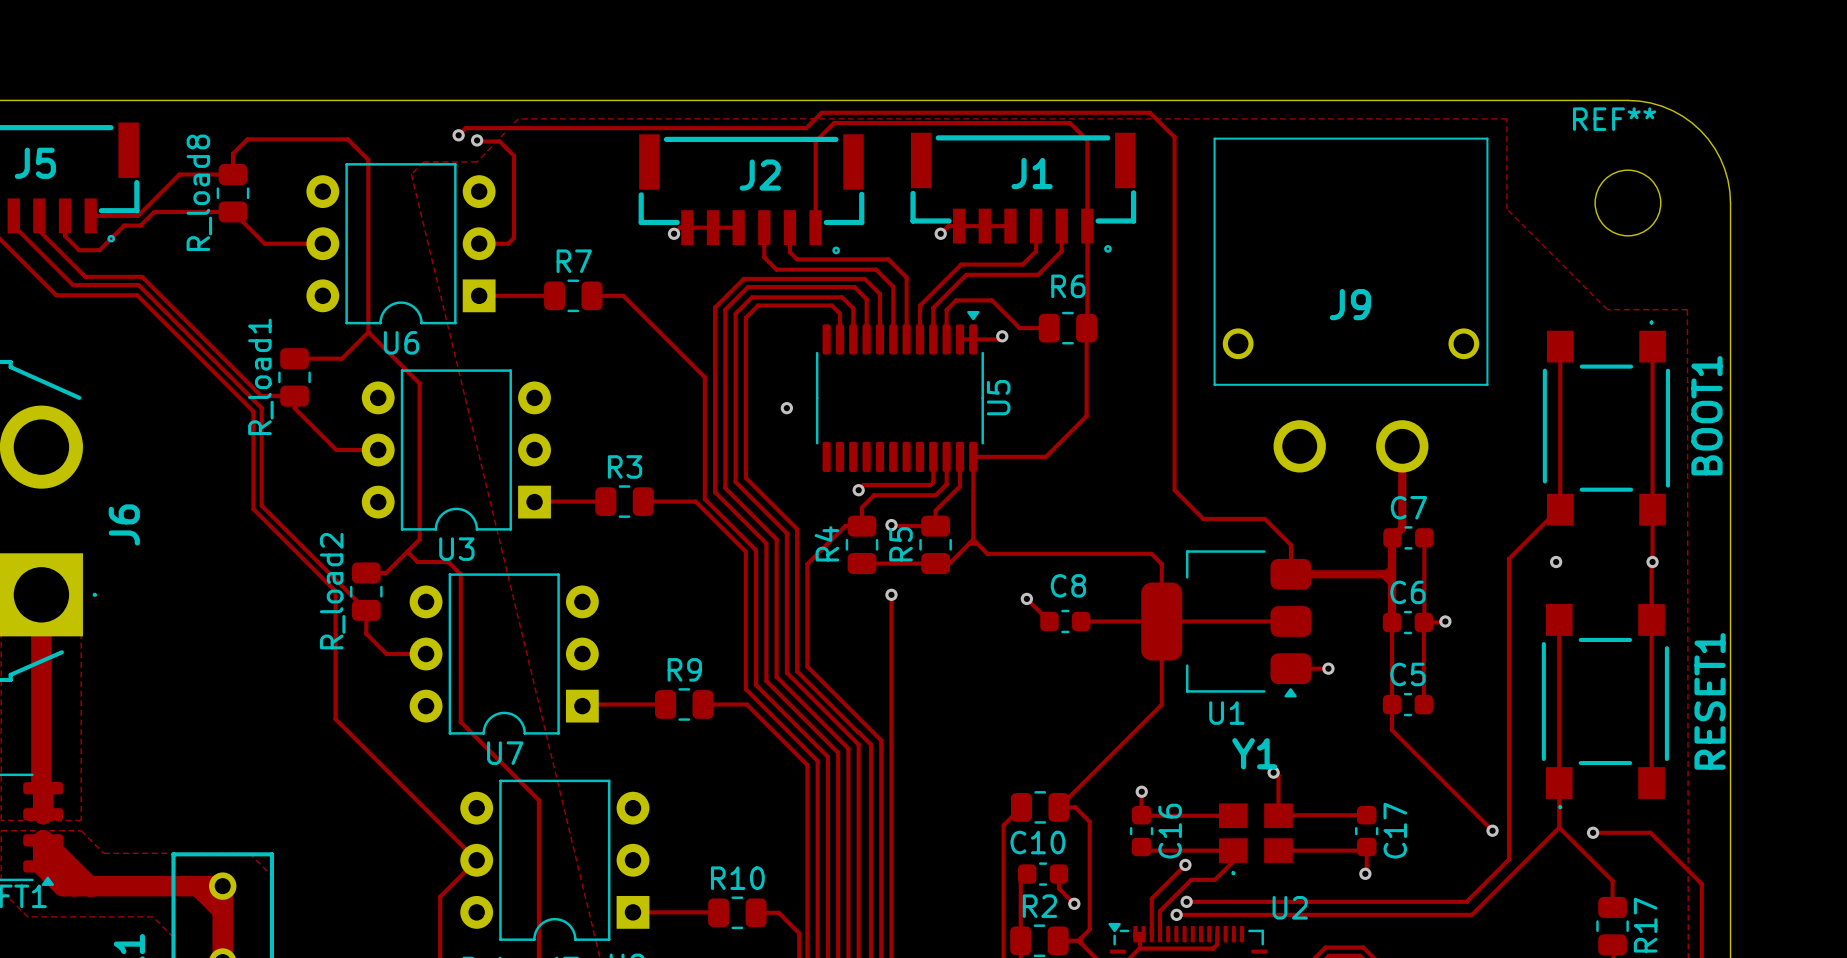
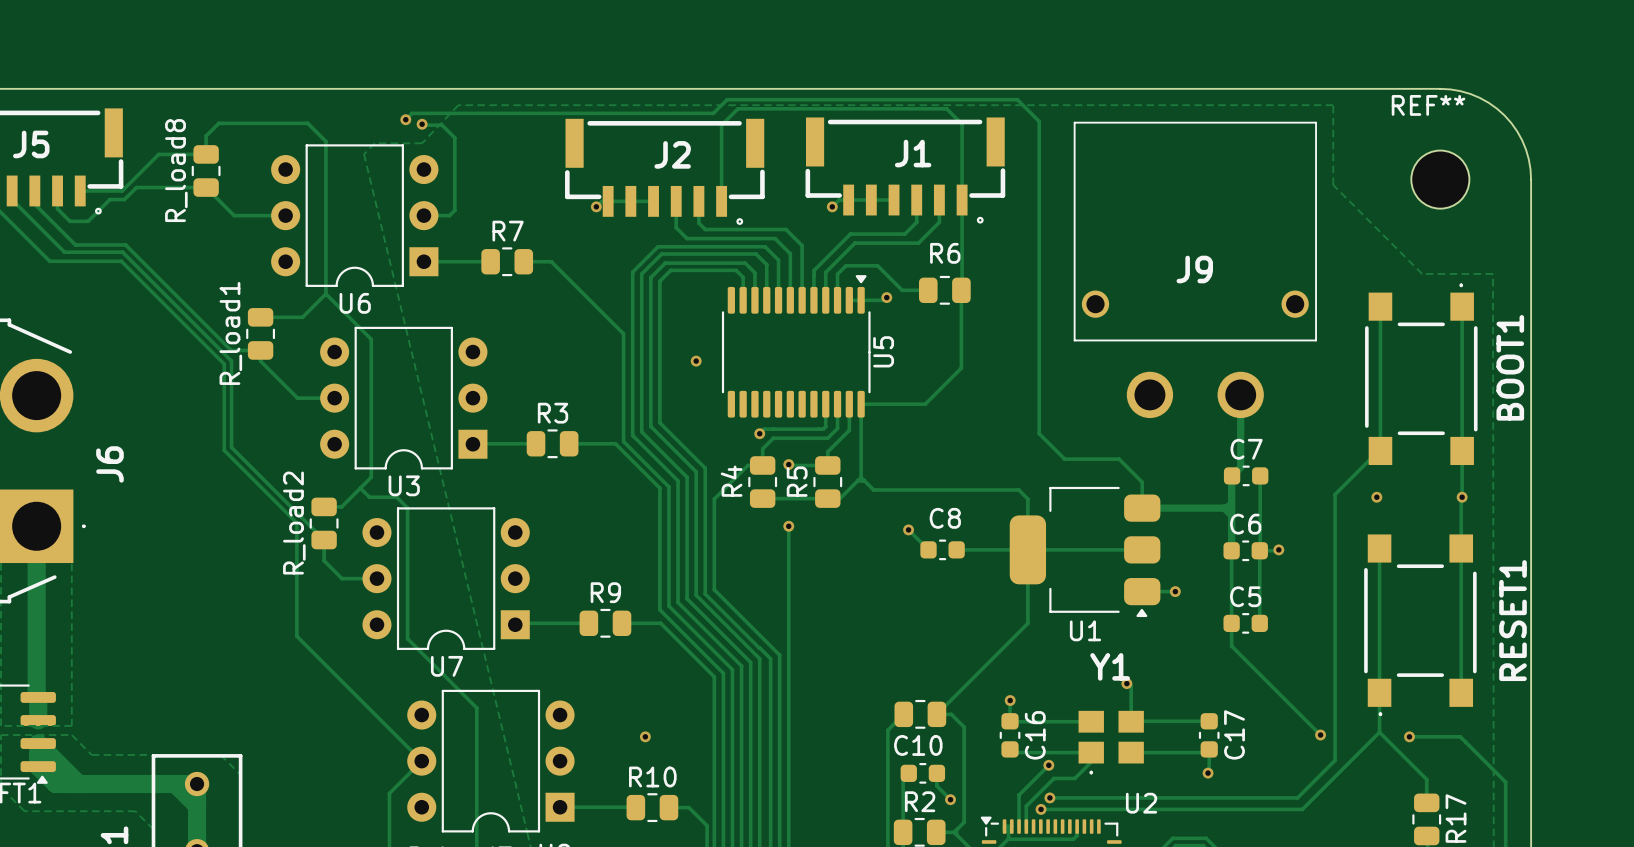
via: none -> (645, 736)

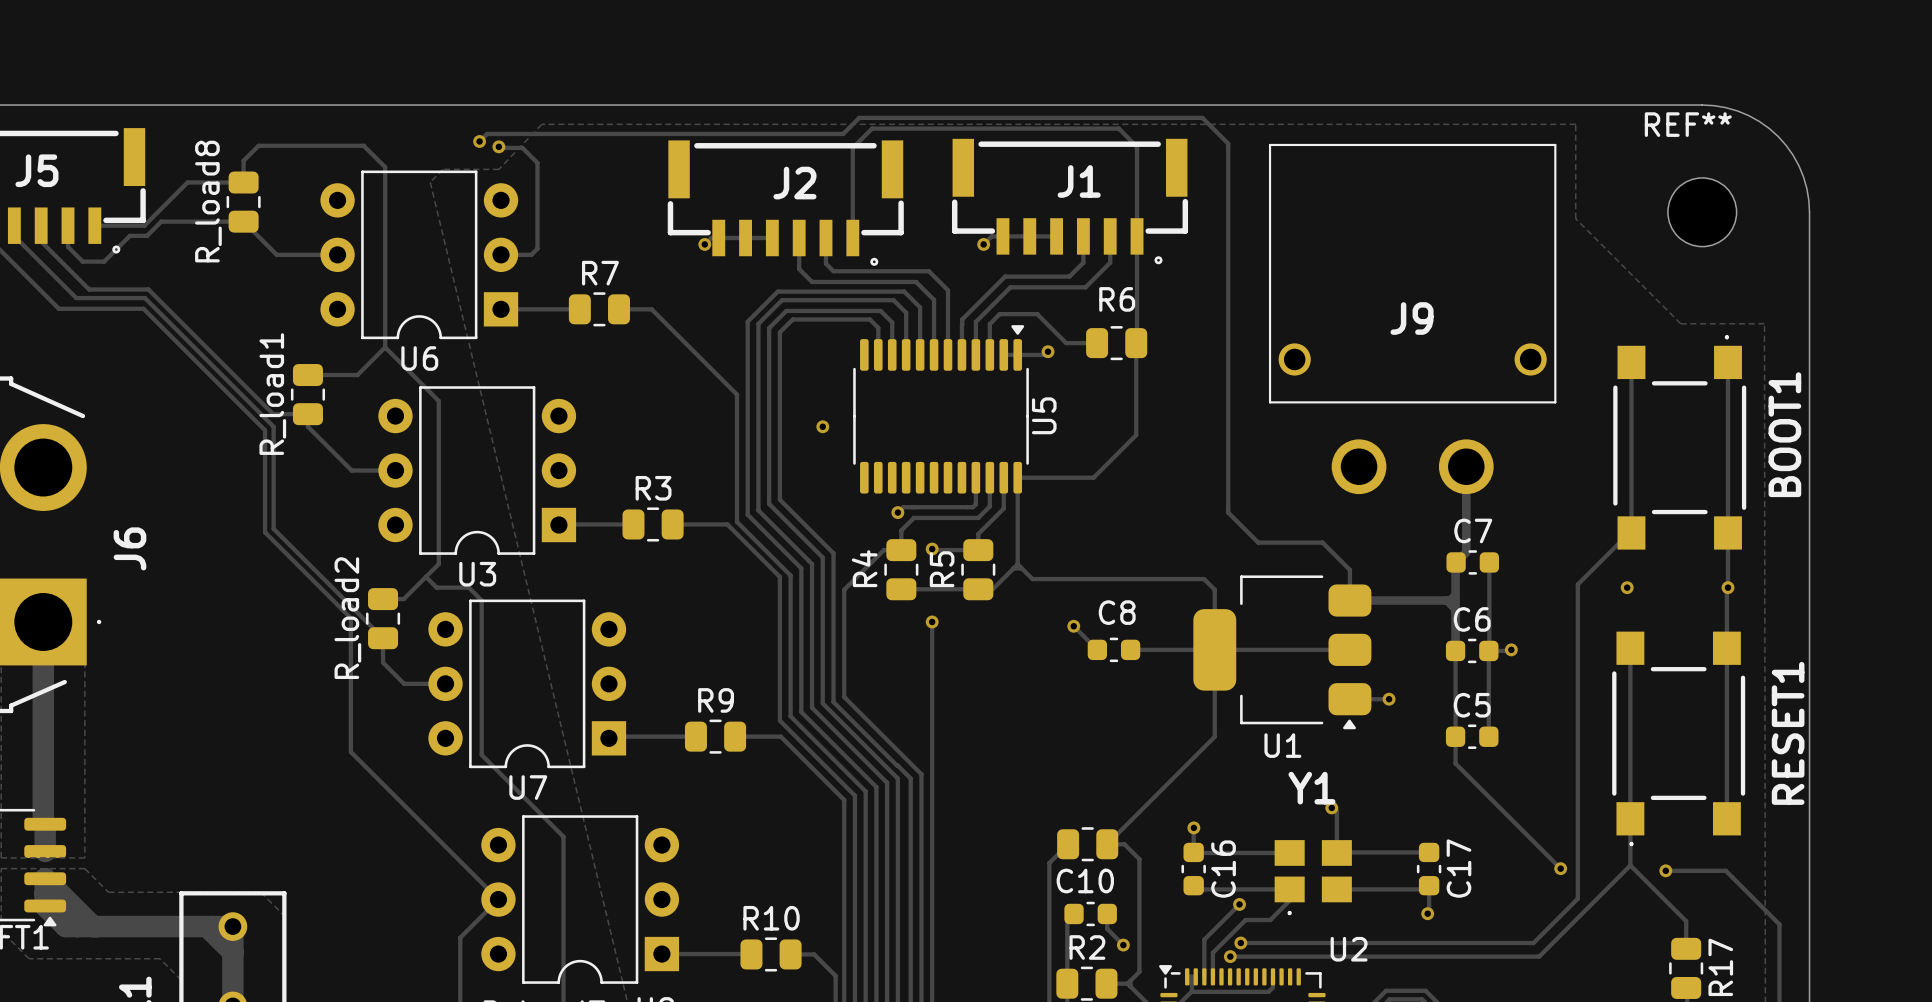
via: (645, 736) -> none

